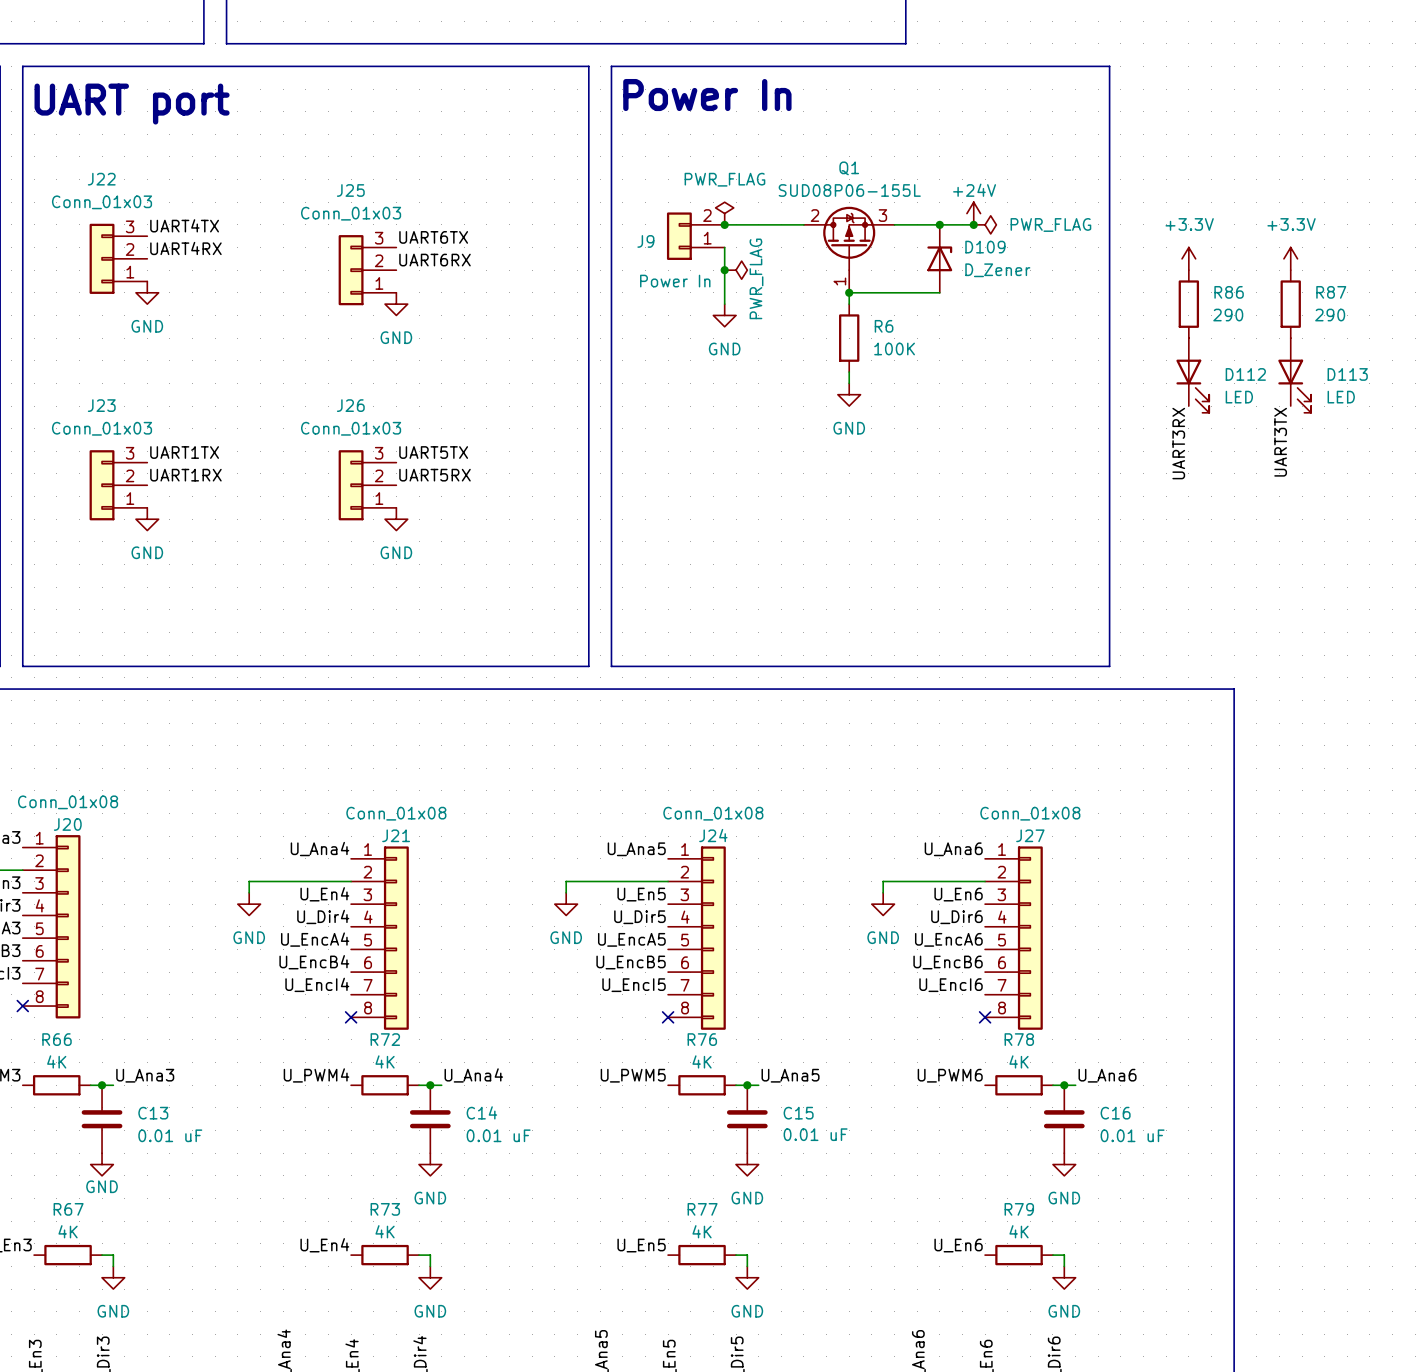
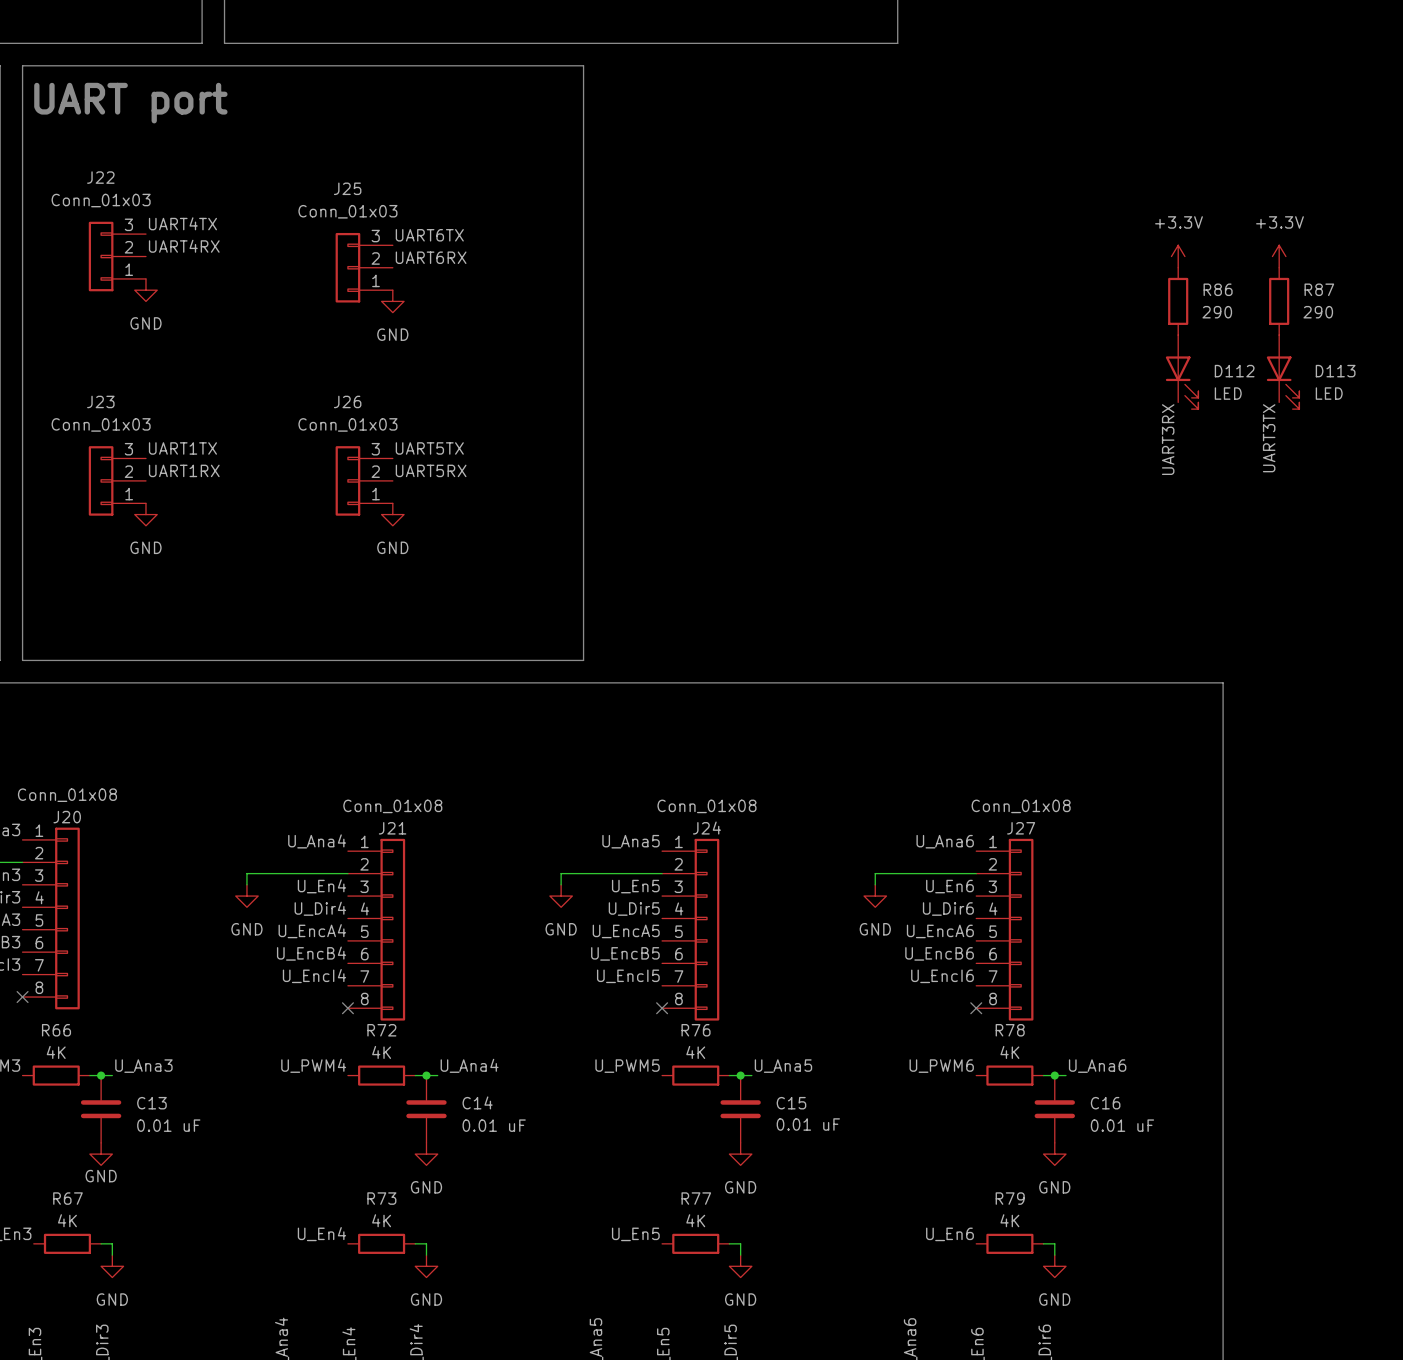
line: (611, 66) (1109, 66) (1109, 666) (611, 666) (611, 66) -> none
text: Power In (707, 95) -> none
power symbol: PWR_FLAG (724, 213) -> none
power symbol: +24V (973, 213) -> none
wire: (724, 224) (803, 224) -> none
junction: (724, 224) -> none
wire: (894, 224) (973, 224) -> none
junction: (939, 224) -> none
junction: (973, 224) -> none
power symbol: PWR_FLAG (985, 224) -> none
J9: Power In (695, 236) -> none
wire: (724, 247) (724, 304) -> none
Q1: SUD08P06-155L (849, 249) -> none
D109: D_Zener (939, 258) -> none
junction: (724, 270) -> none
power symbol: PWR_FLAG (736, 270) -> none
junction: (849, 292) -> none
wire: (939, 292) (849, 292) (849, 304) -> none
power symbol: GND (724, 315) -> none
R6: 100K (849, 338) -> none
wire: (849, 372) (849, 383) -> none
power symbol: GND (849, 394) -> none

